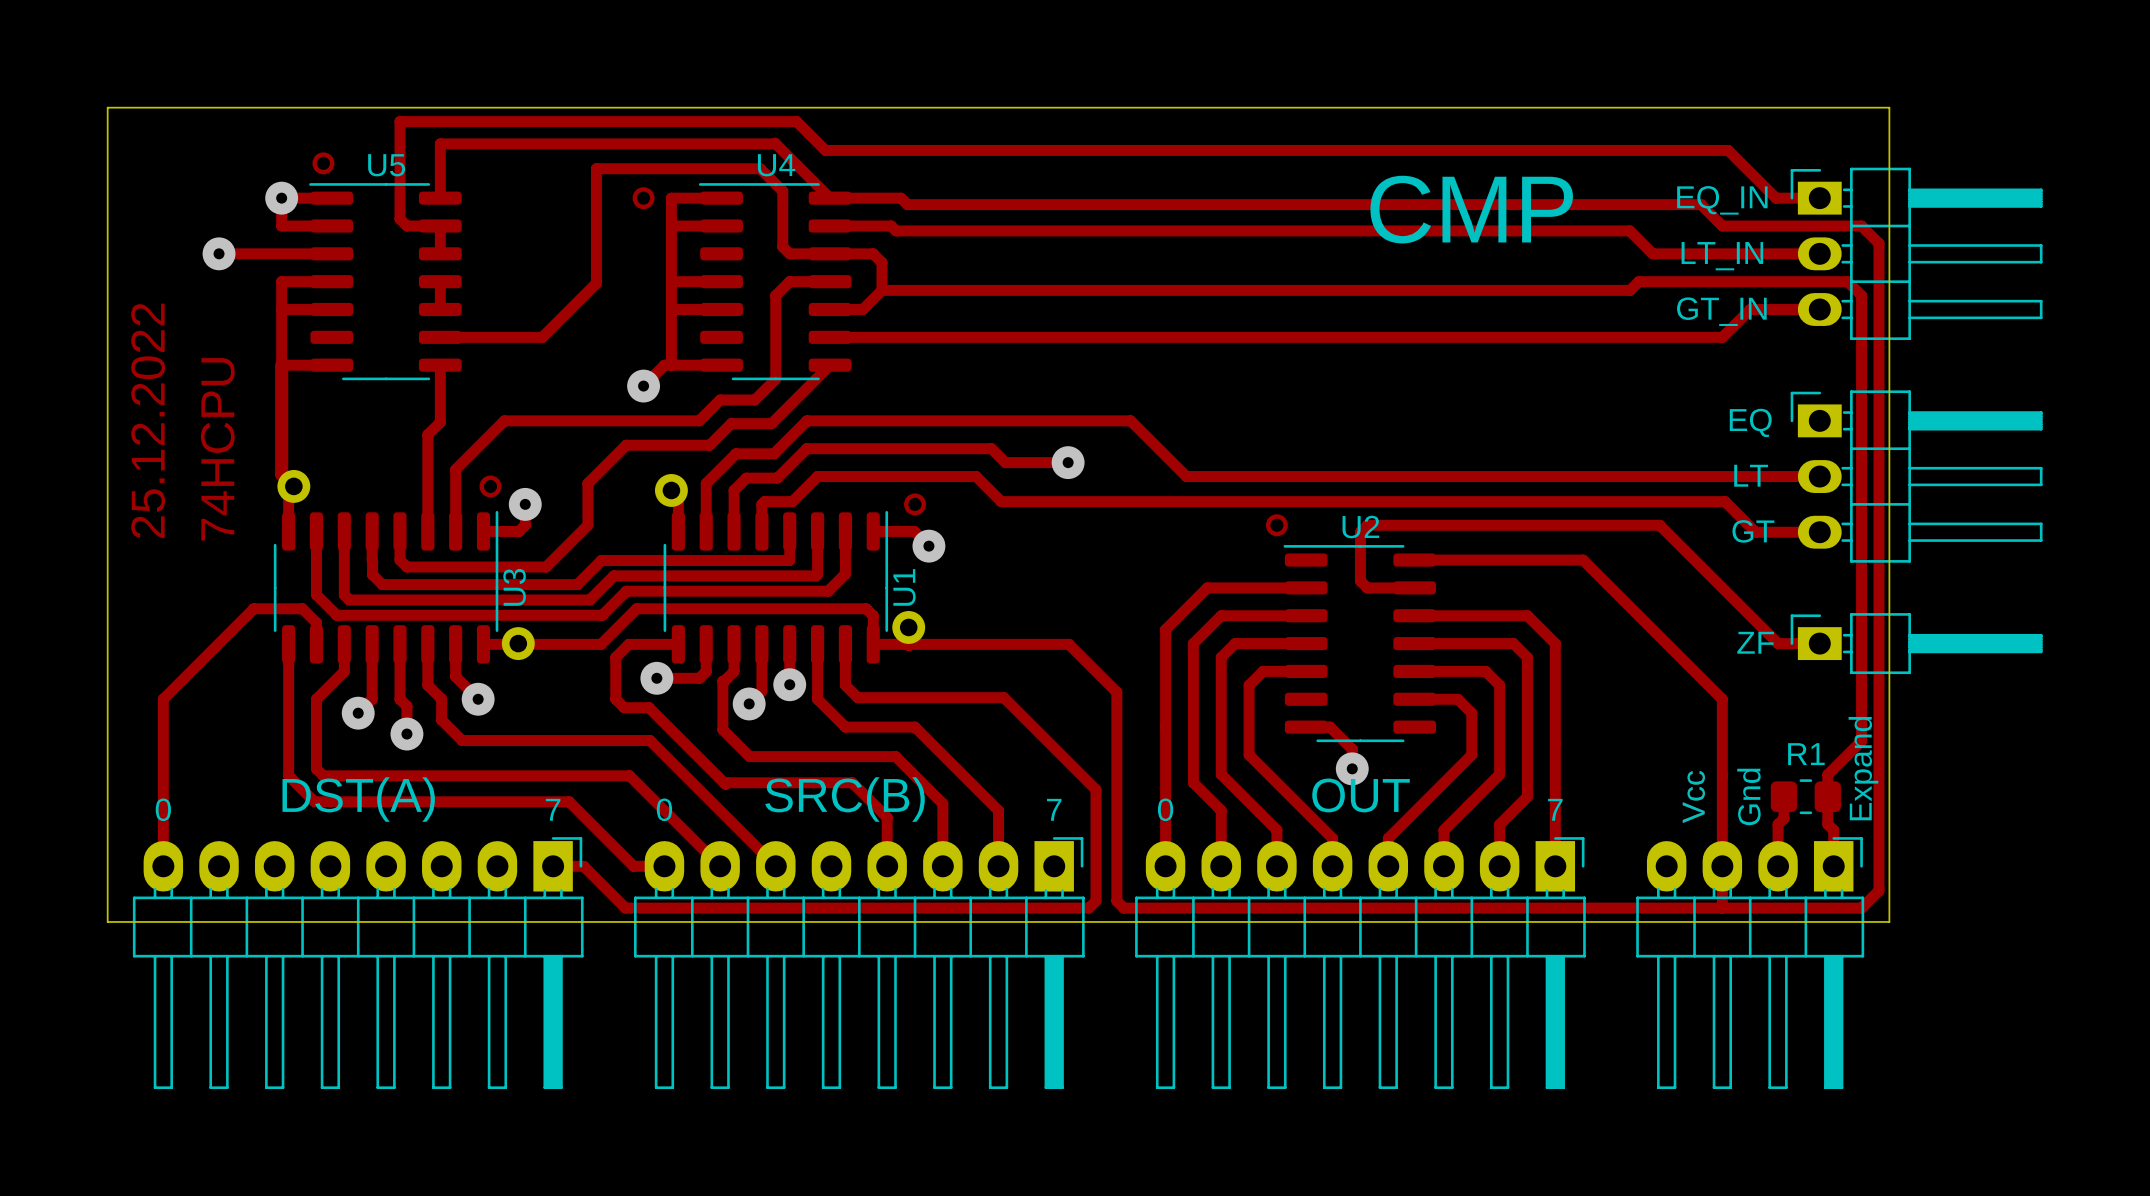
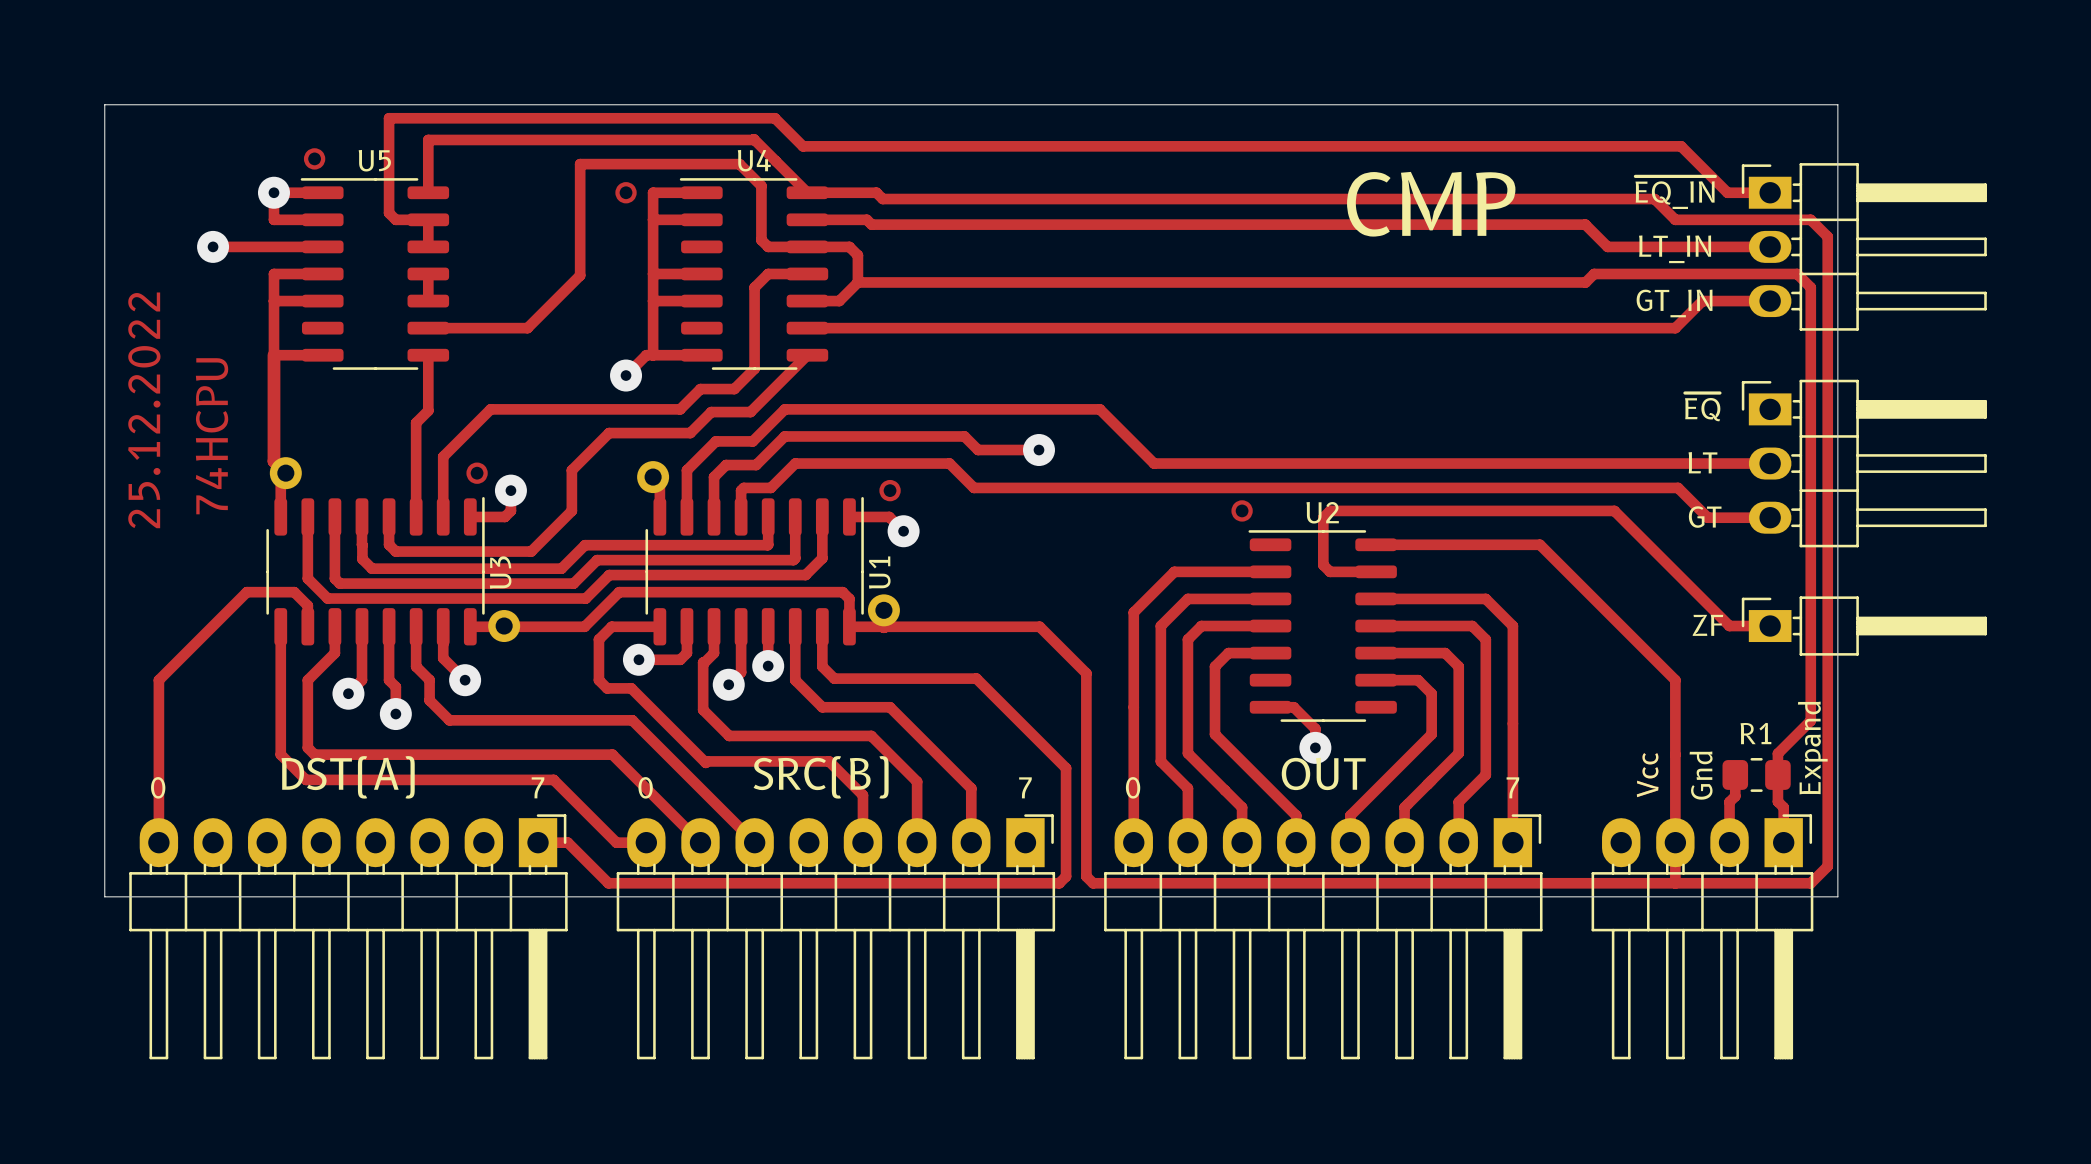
text: EQ_IN (1722, 200) -> ~{EQ_IN} (1675, 192)
text: EQ (1750, 422) -> ~{EQ} (1702, 407)

